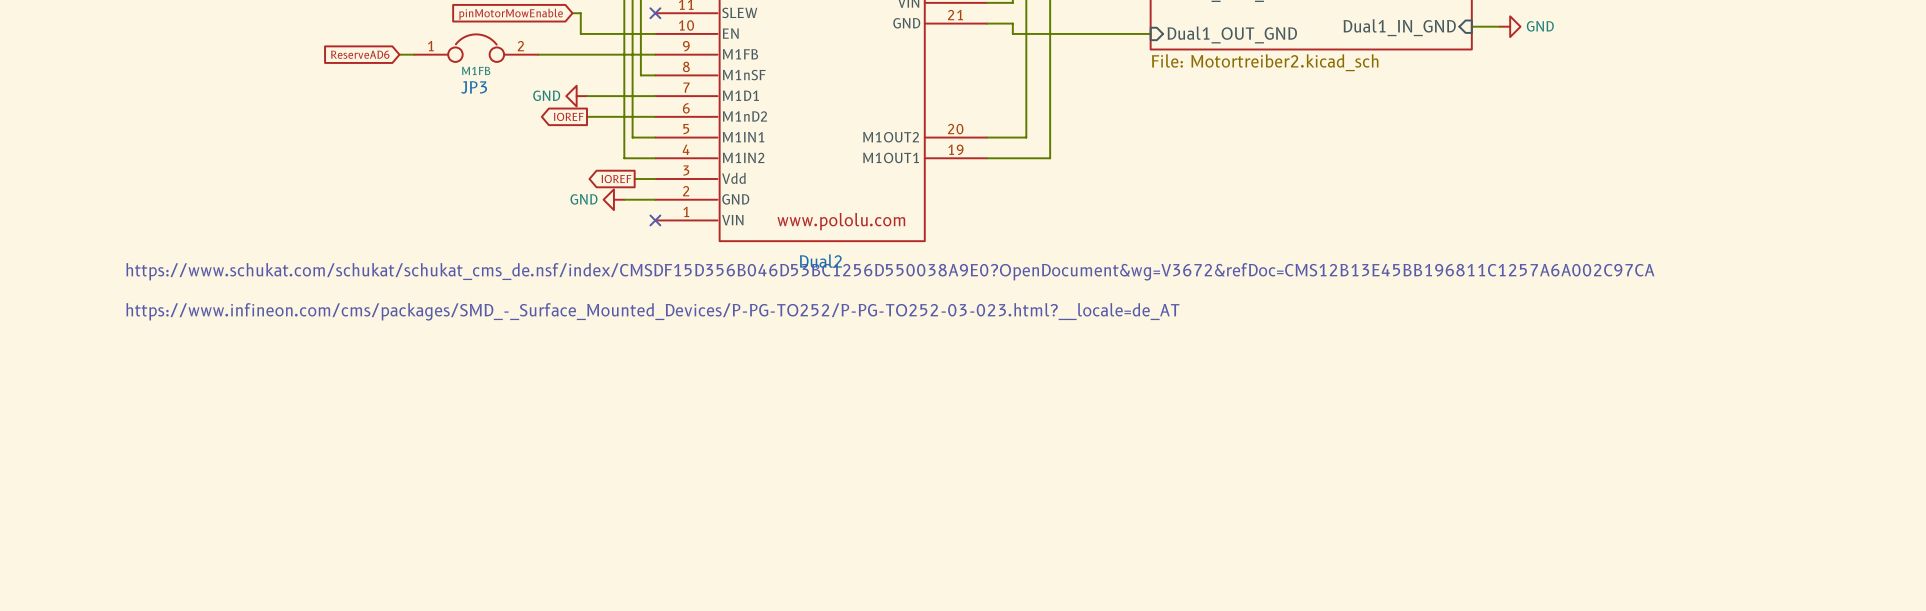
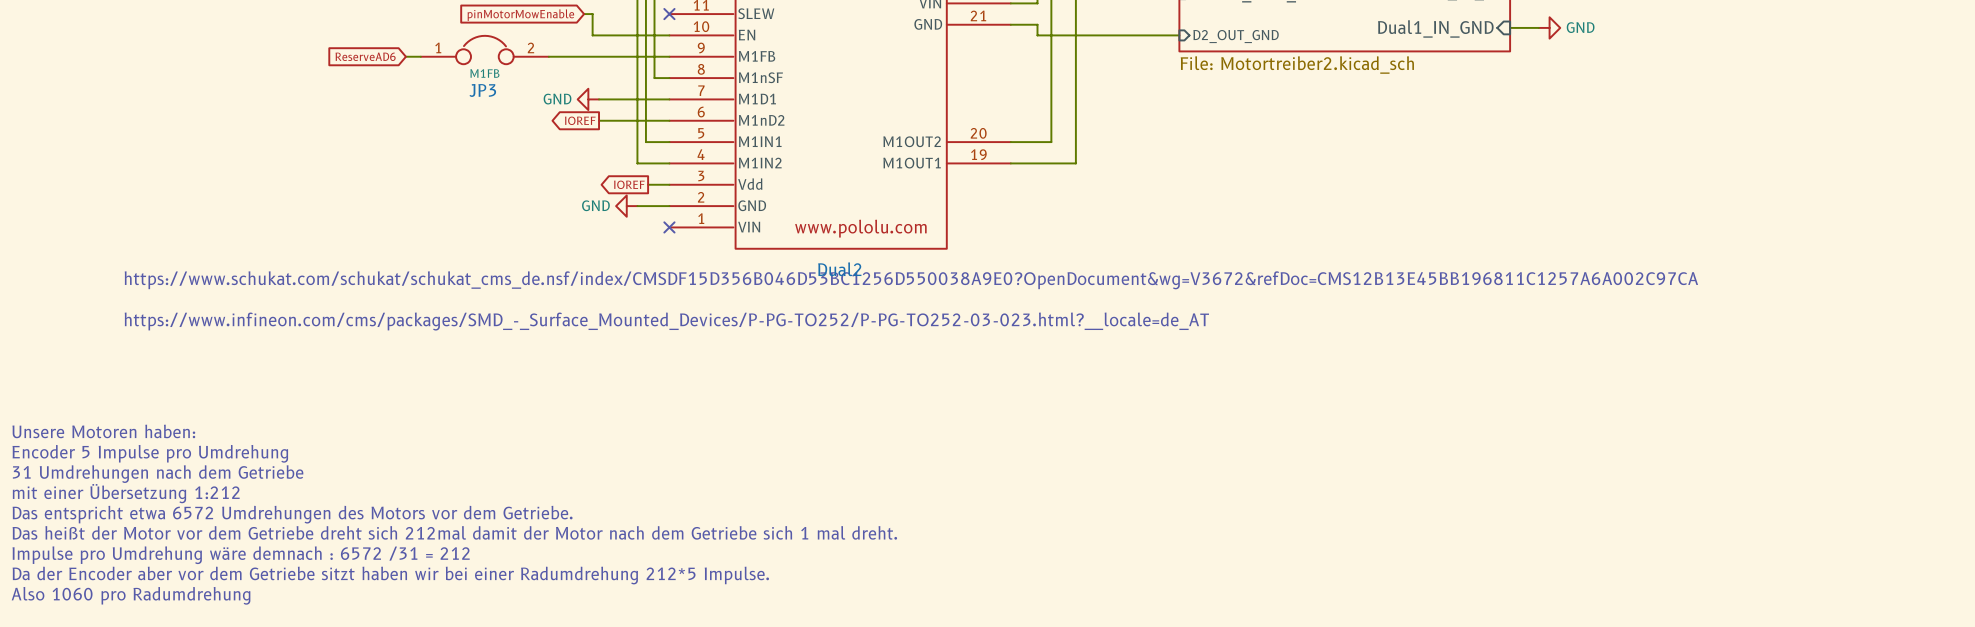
sheet pin: Dual1_OUT_GND (1232, 34) -> D2_OUT_GND (1236, 36)
text: none -> Unsere Motoren haben: (103, 431)
text: none -> Encoder 5 Impulse pro Umdrehung (150, 453)
text: none -> 31 Umdrehungen nach dem Getriebe (158, 474)
text: none -> mit einer Übersetzung 1:212 (126, 493)
text: none -> Das entspricht etwa 6572 Umdrehungen des Motors vor dem Getriebe. (292, 514)
text: none -> Das heißt der Motor vor dem Getriebe dreht sich 212mal damit der Motor nach dem Getriebe sich 1 mal dreht. (454, 532)
text: none -> Impulse pro Umdrehung wäre demnach : 6572 /31 = 212 (241, 555)
text: none -> Da der Encoder aber vor dem Getriebe sitzt haben wir bei einer Radumdrehung 212*5 Impulse. (390, 575)
text: none -> Also 1060 pro Radumdrehung (131, 595)

